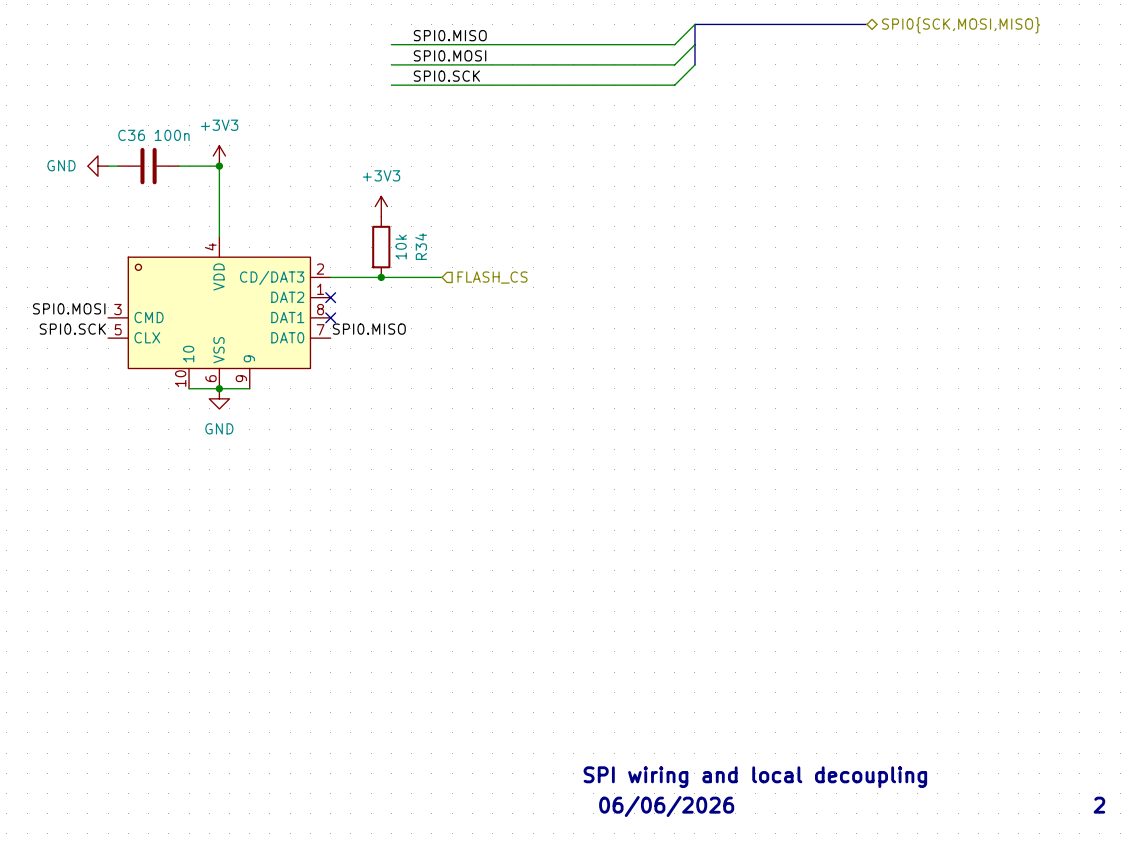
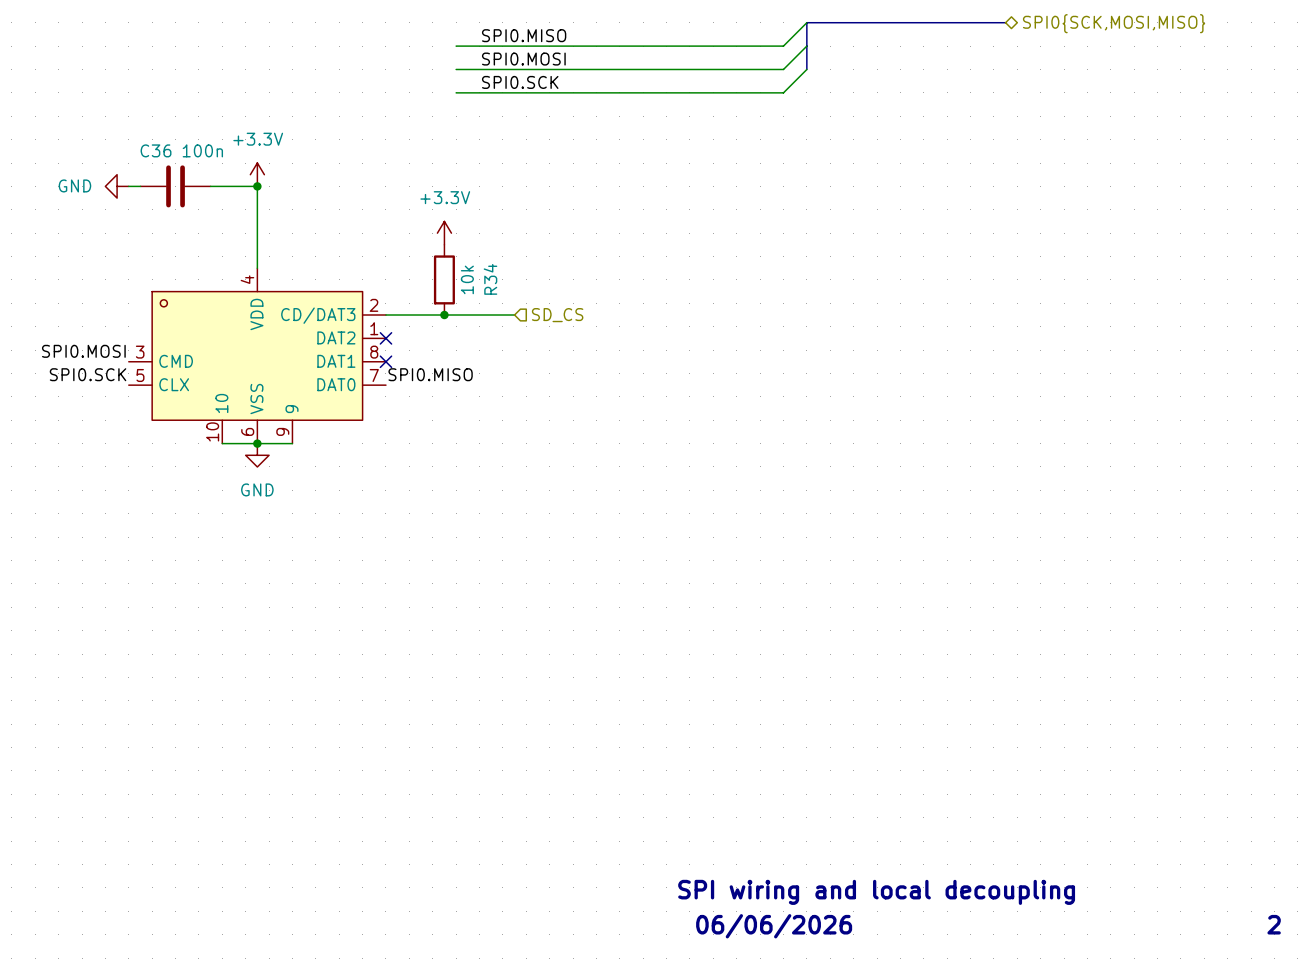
power symbol: +3V3 (219, 155) -> +3.3V (257, 174)
power symbol: +3V3 (381, 206) -> +3.3V (444, 233)
hierarchical label: FLASH_CS (492, 277) -> SD_CS (557, 315)

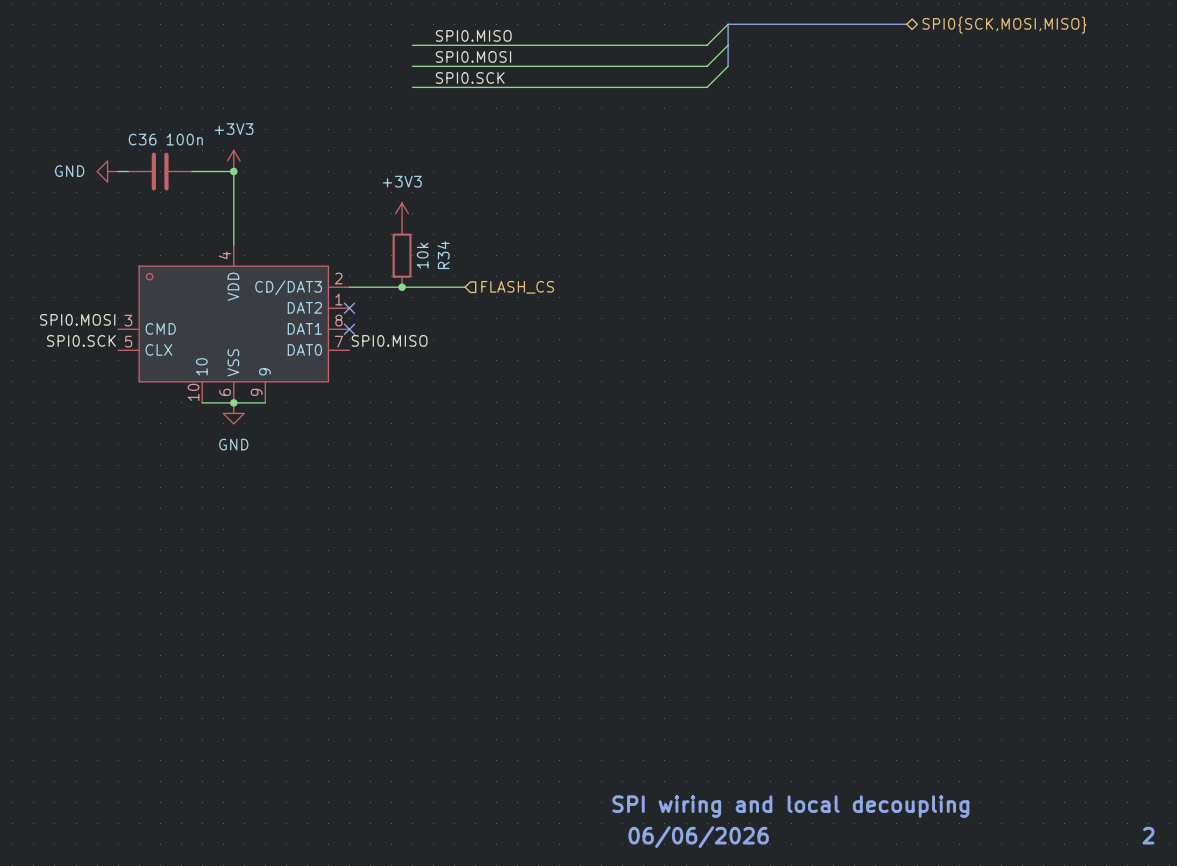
power symbol: +3.3V (257, 174) -> +3V3 (233, 161)
power symbol: +3.3V (444, 233) -> +3V3 (402, 213)
hierarchical label: SD_CS (557, 315) -> FLASH_CS (517, 287)

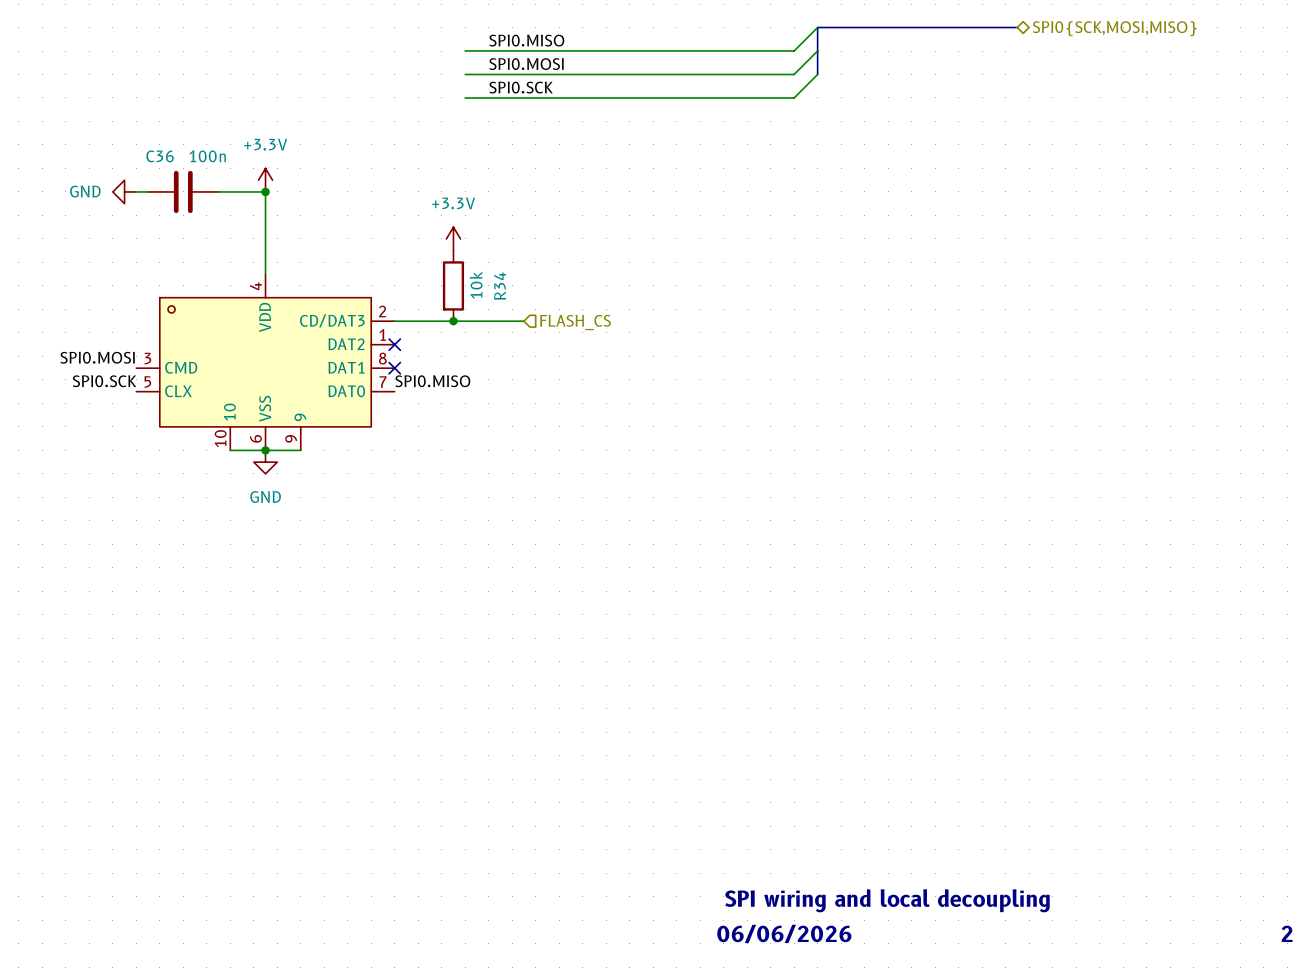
power symbol: +3V3 (233, 161) -> +3.3V (265, 180)
power symbol: +3V3 (402, 213) -> +3.3V (453, 238)

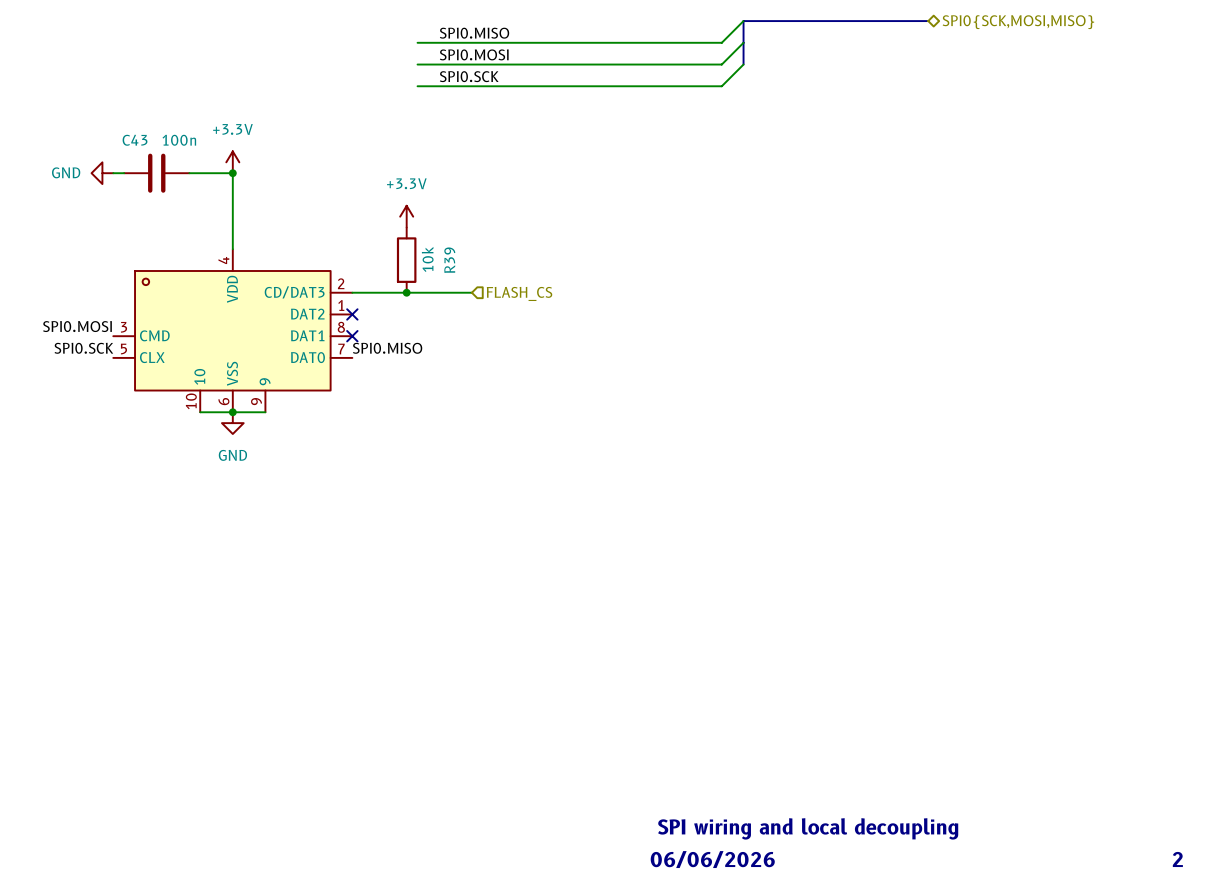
C36 name: C36 (160, 156) -> C43 (135, 140)
R34 name: R34 (500, 286) -> R39 (449, 260)

